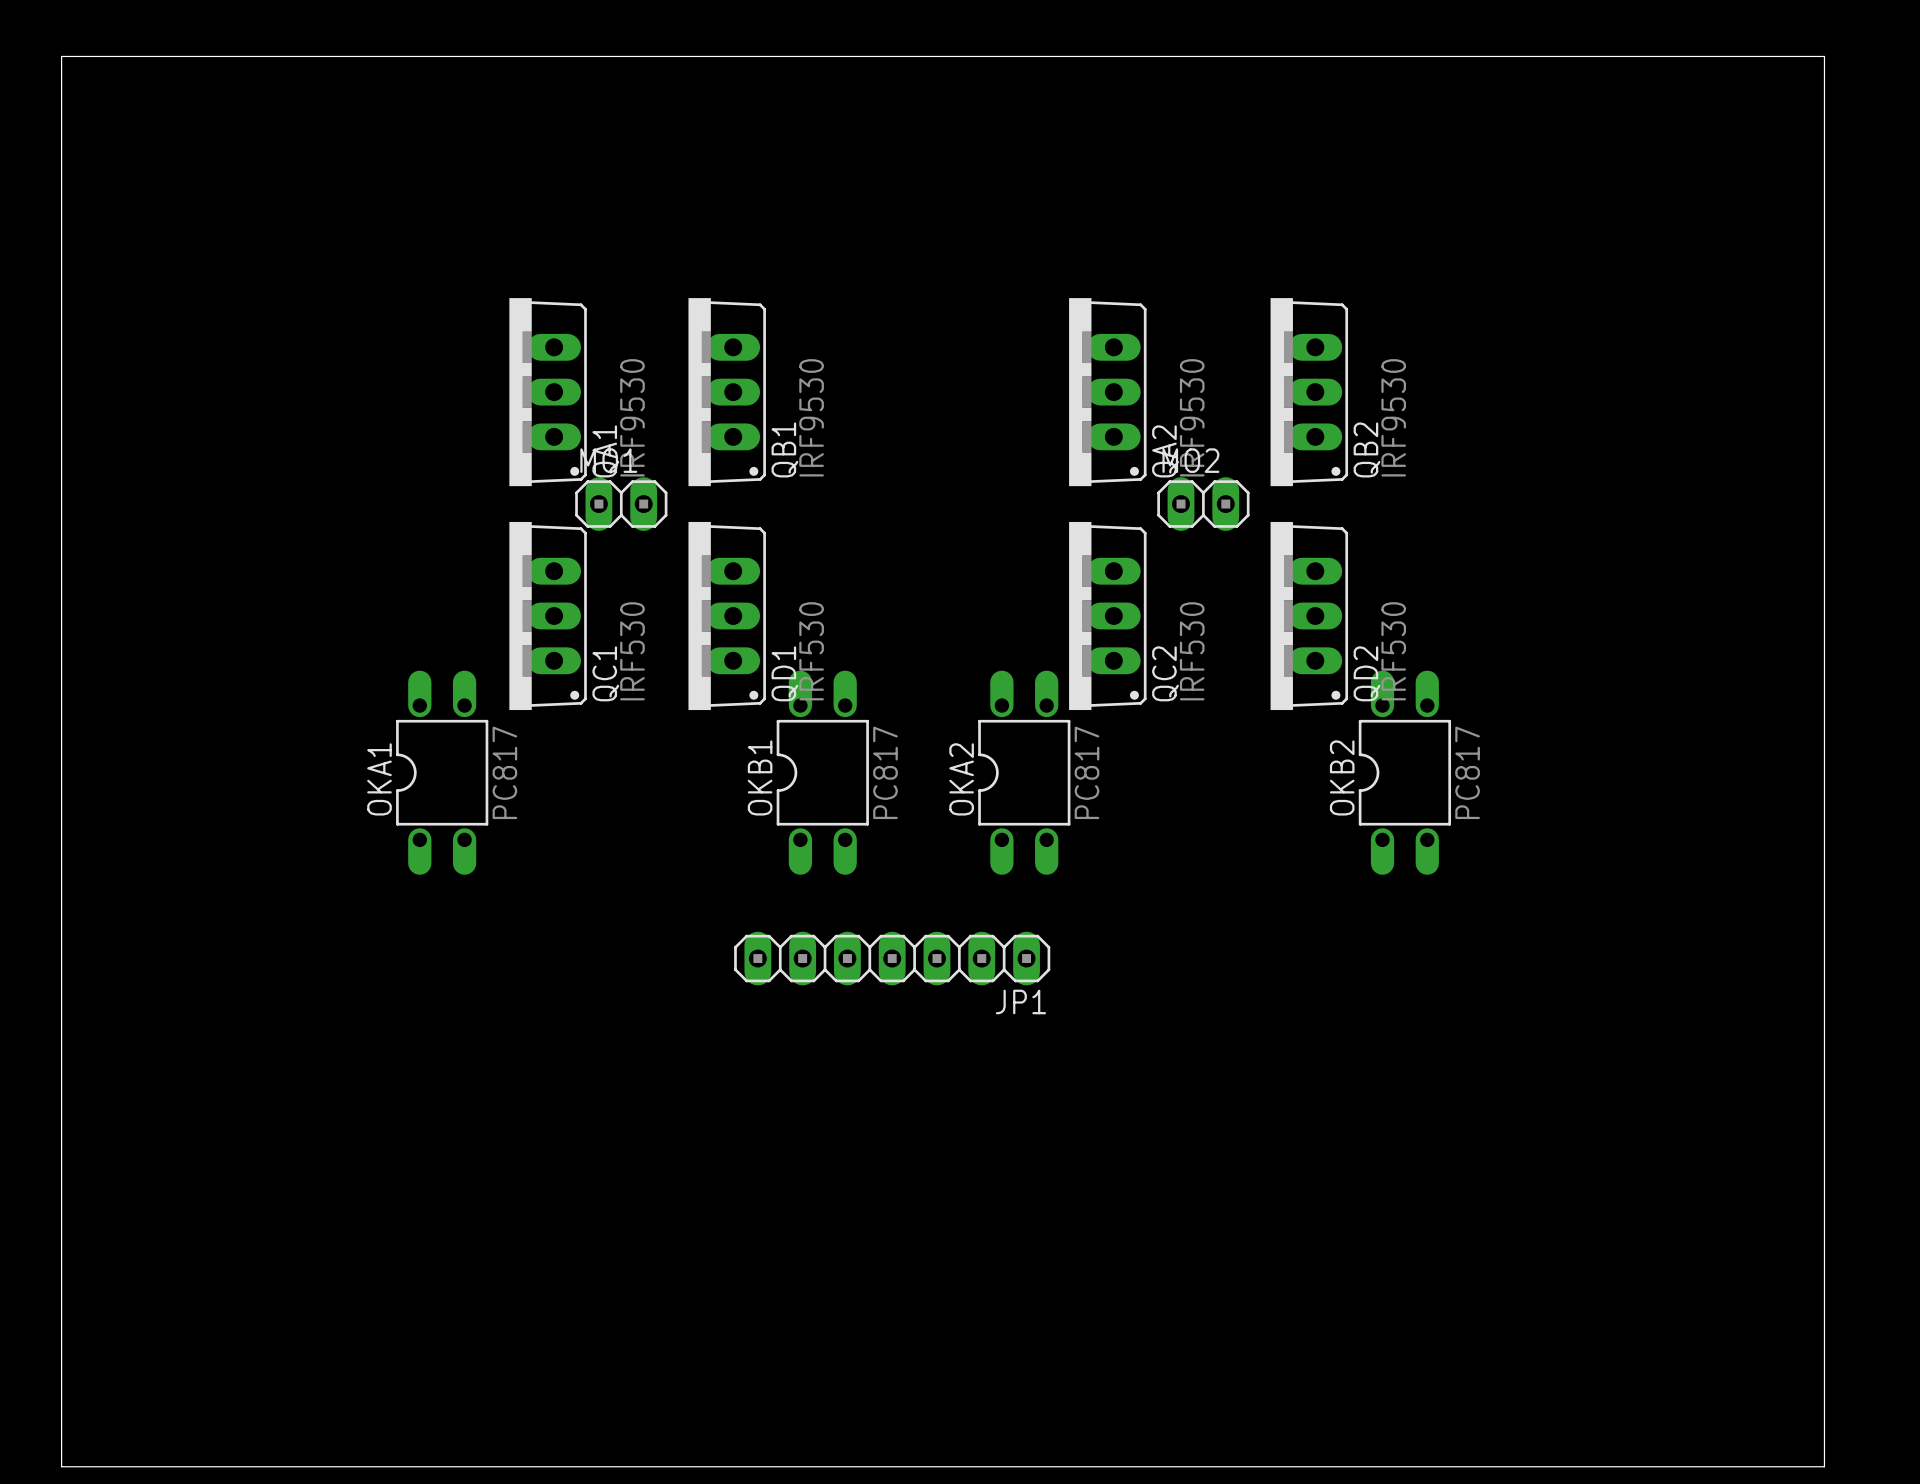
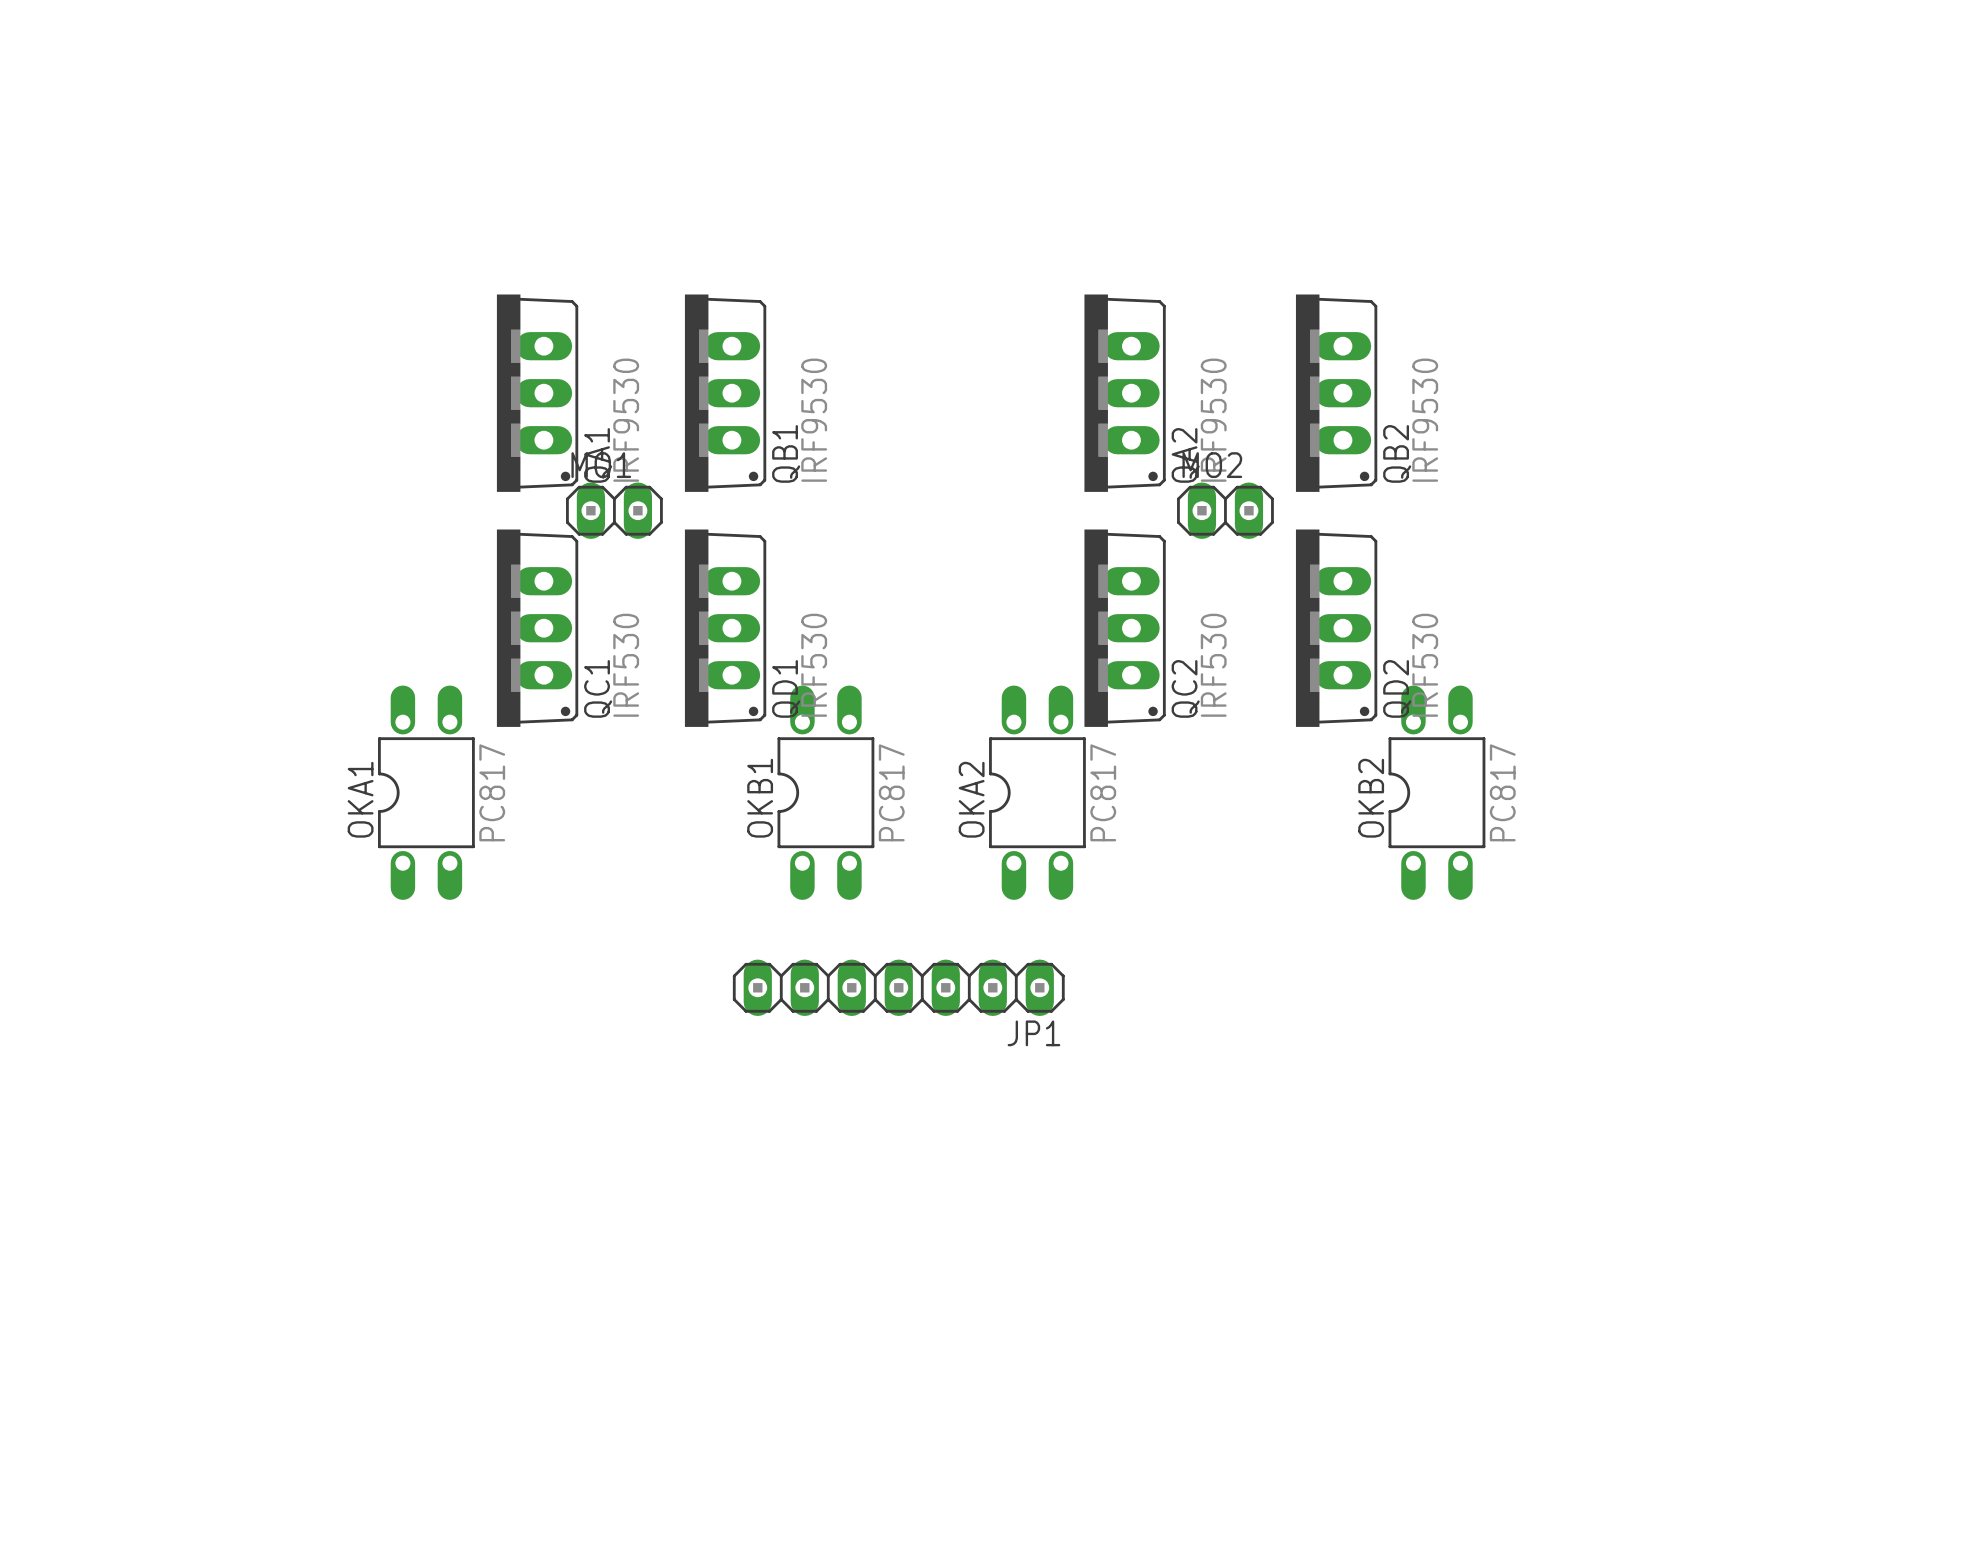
board edge: (61, 56) (1824, 56) (1824, 1466) (61, 1466) (61, 56) -> none

